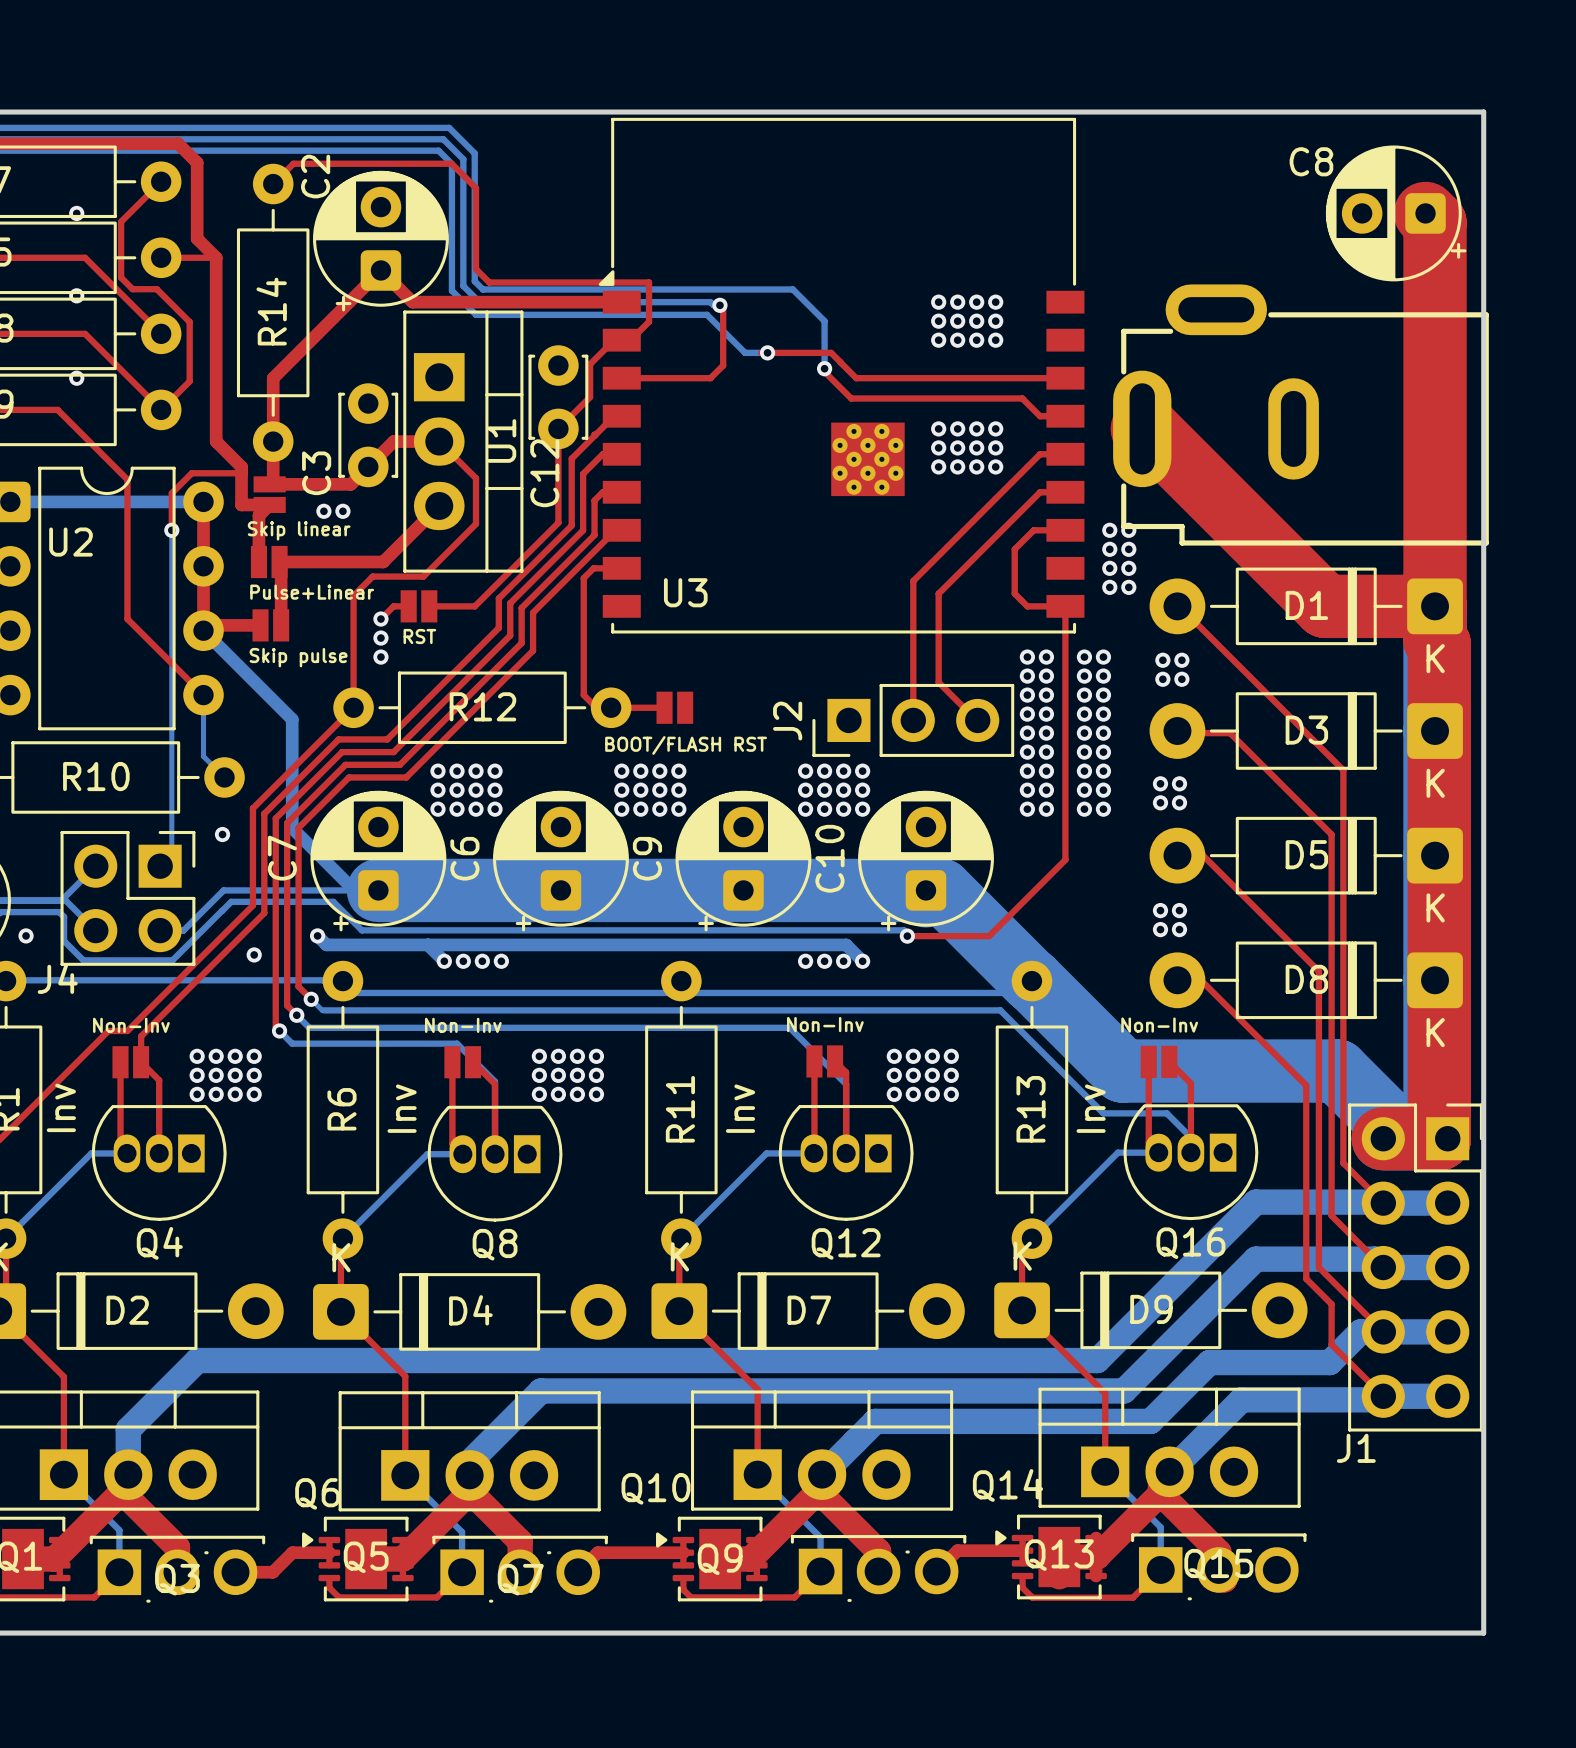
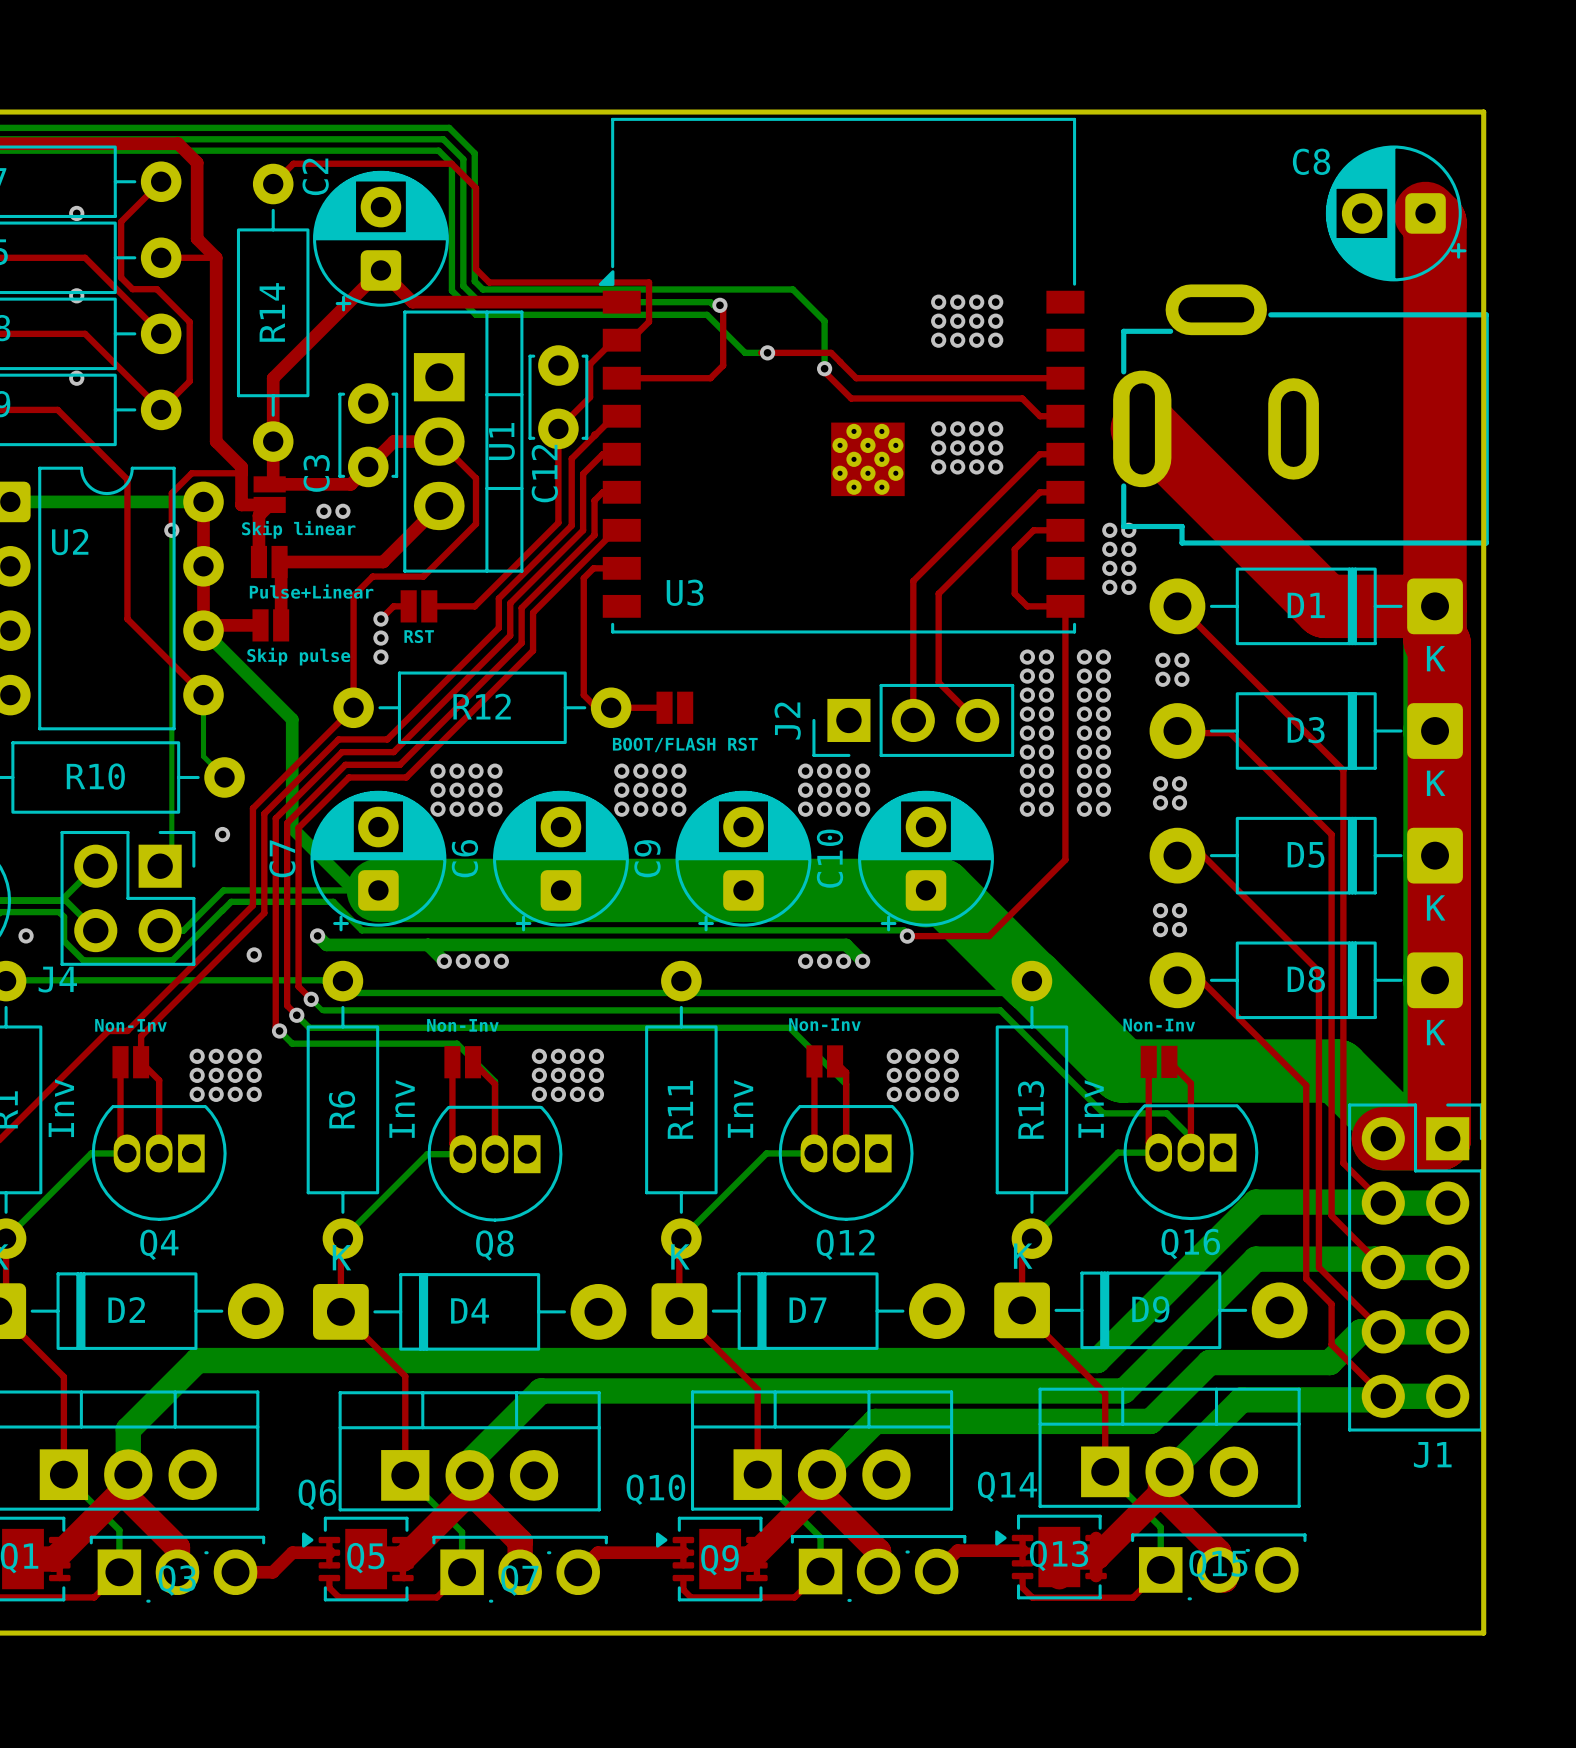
J1 name position: J1 (1356, 1448) -> J1 (1432, 1454)

